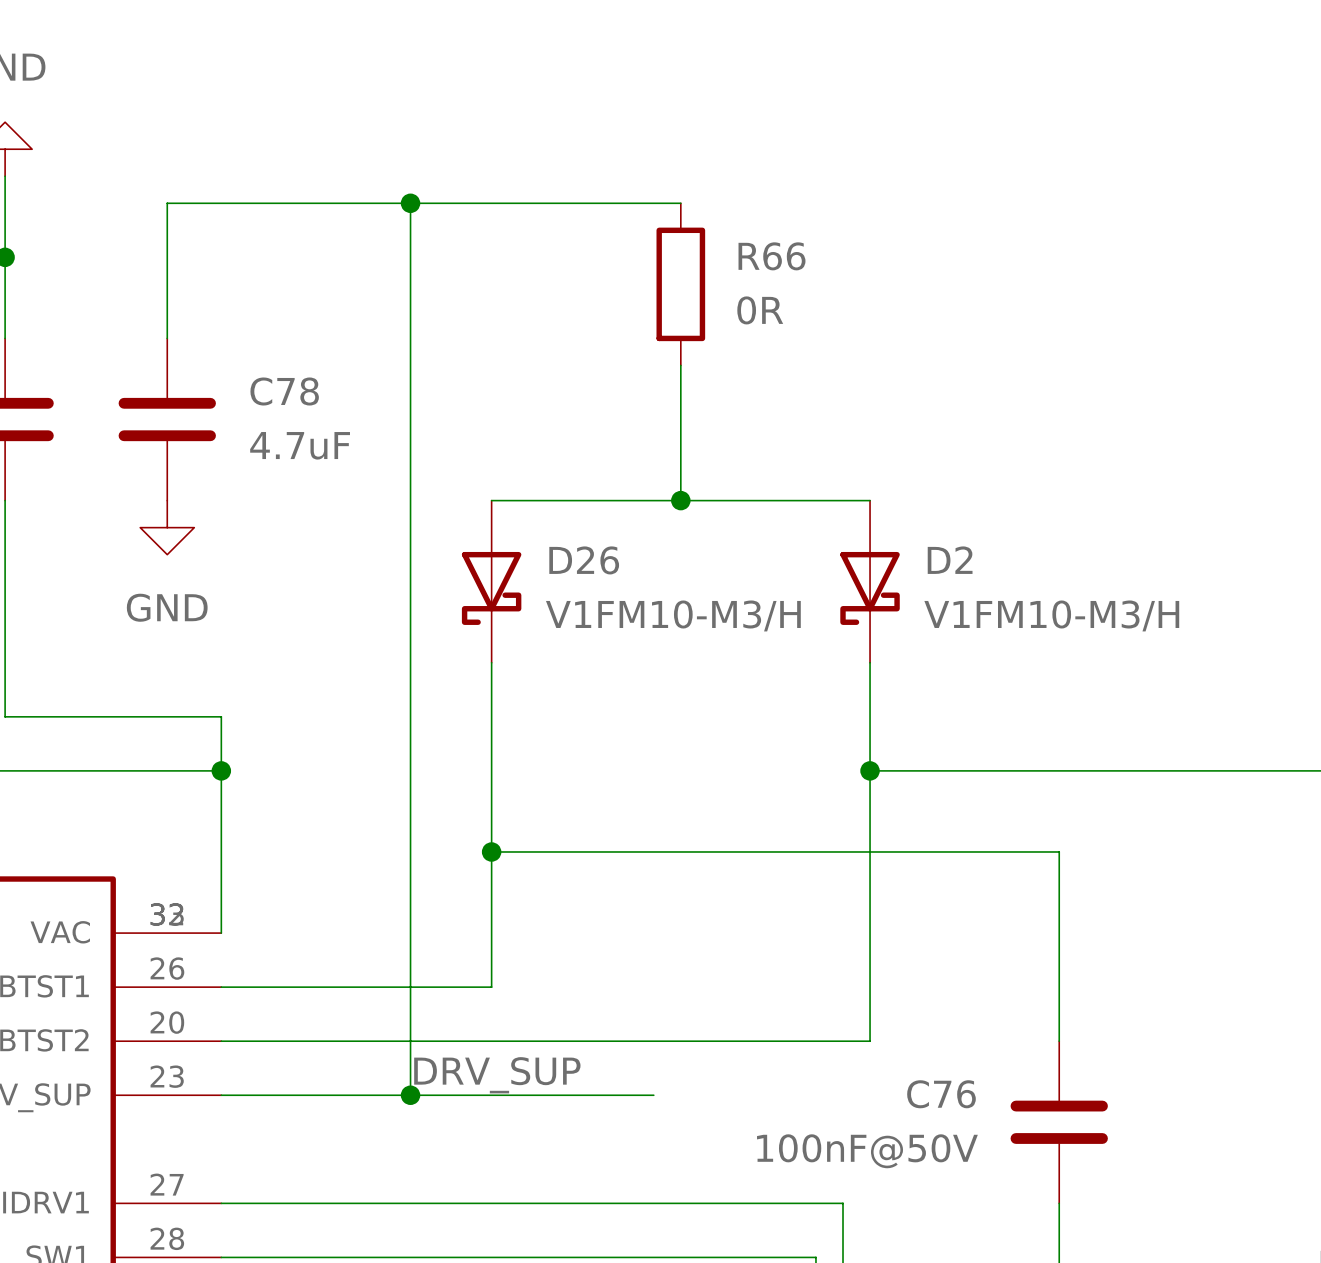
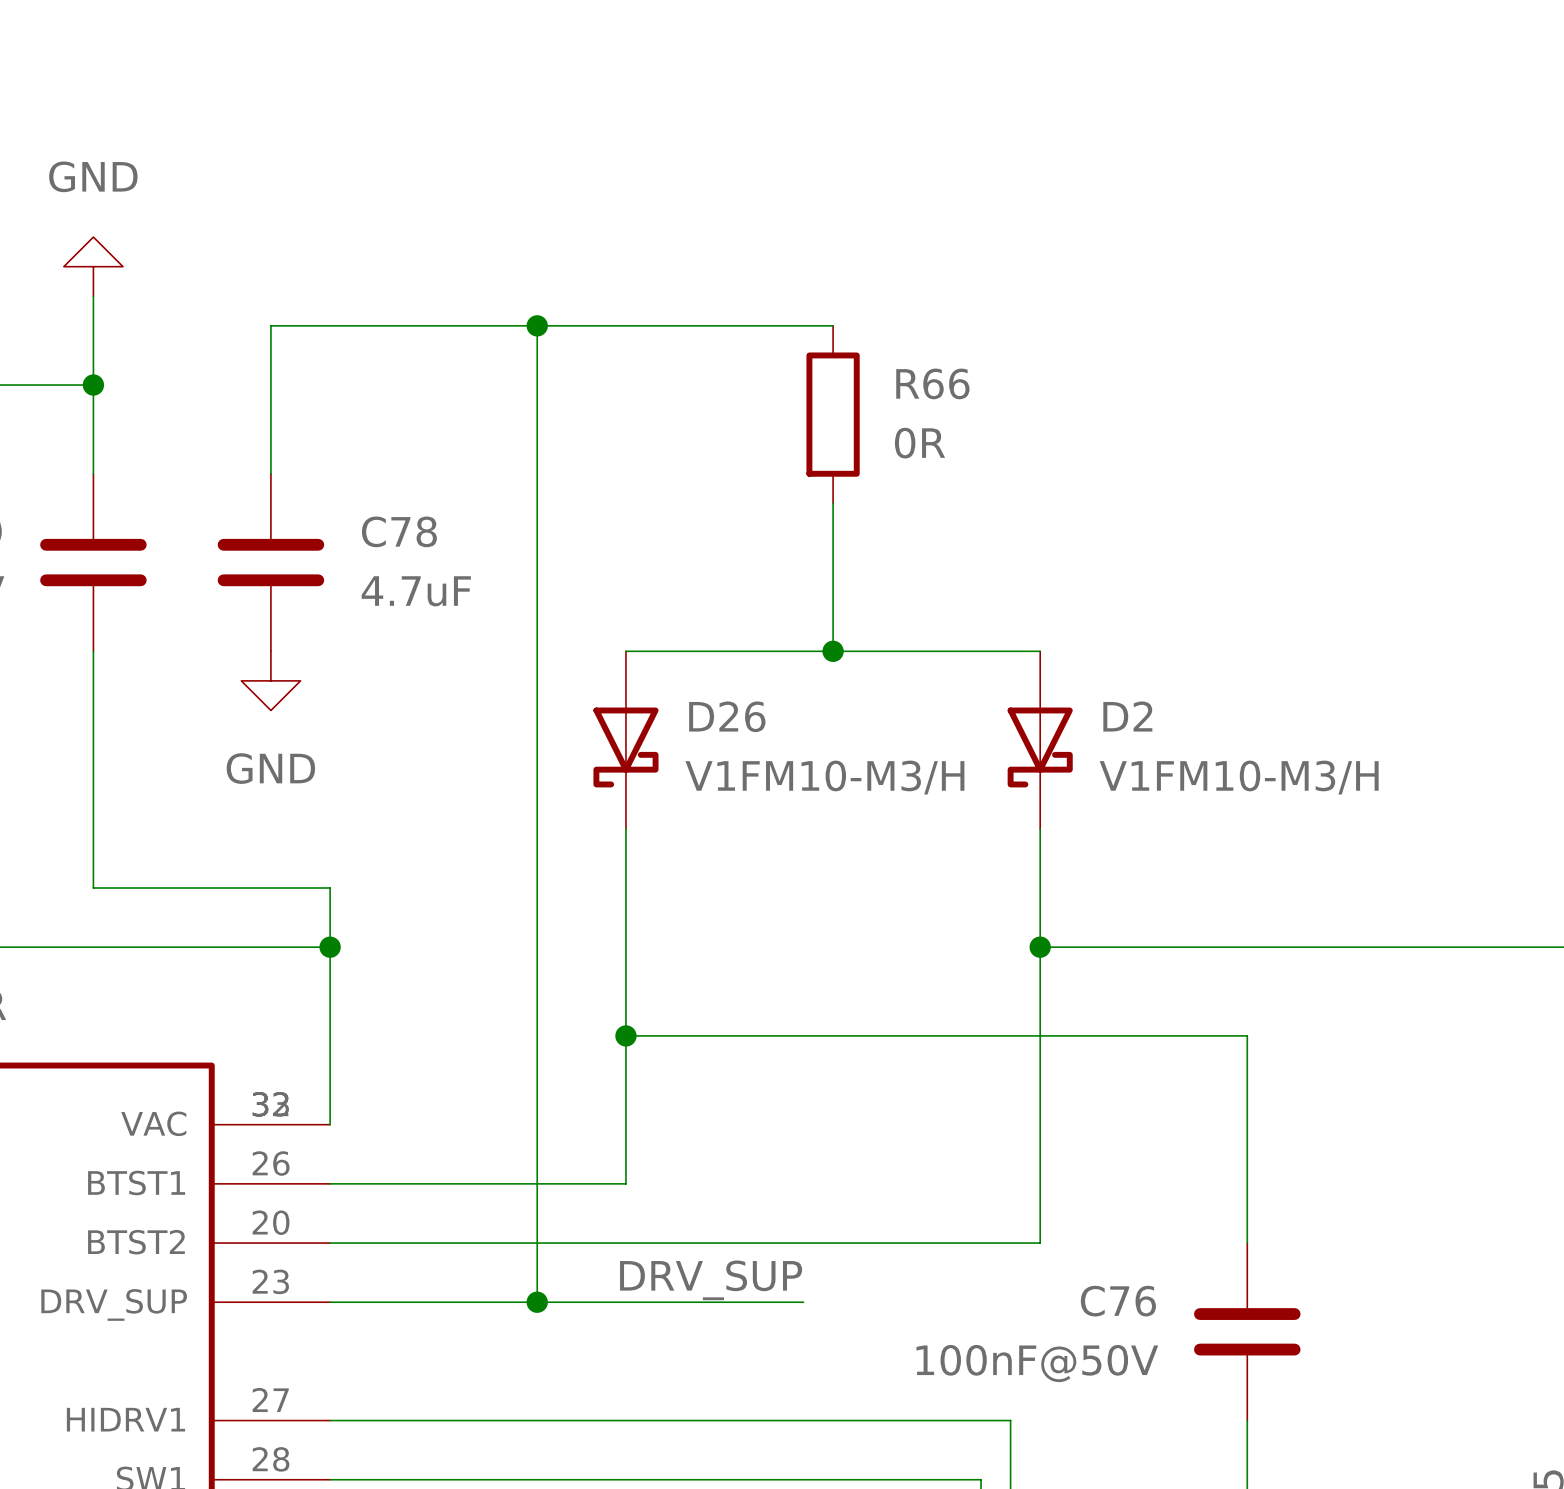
label position: DRV_SUP (497, 1075) -> DRV_SUP (711, 1280)

